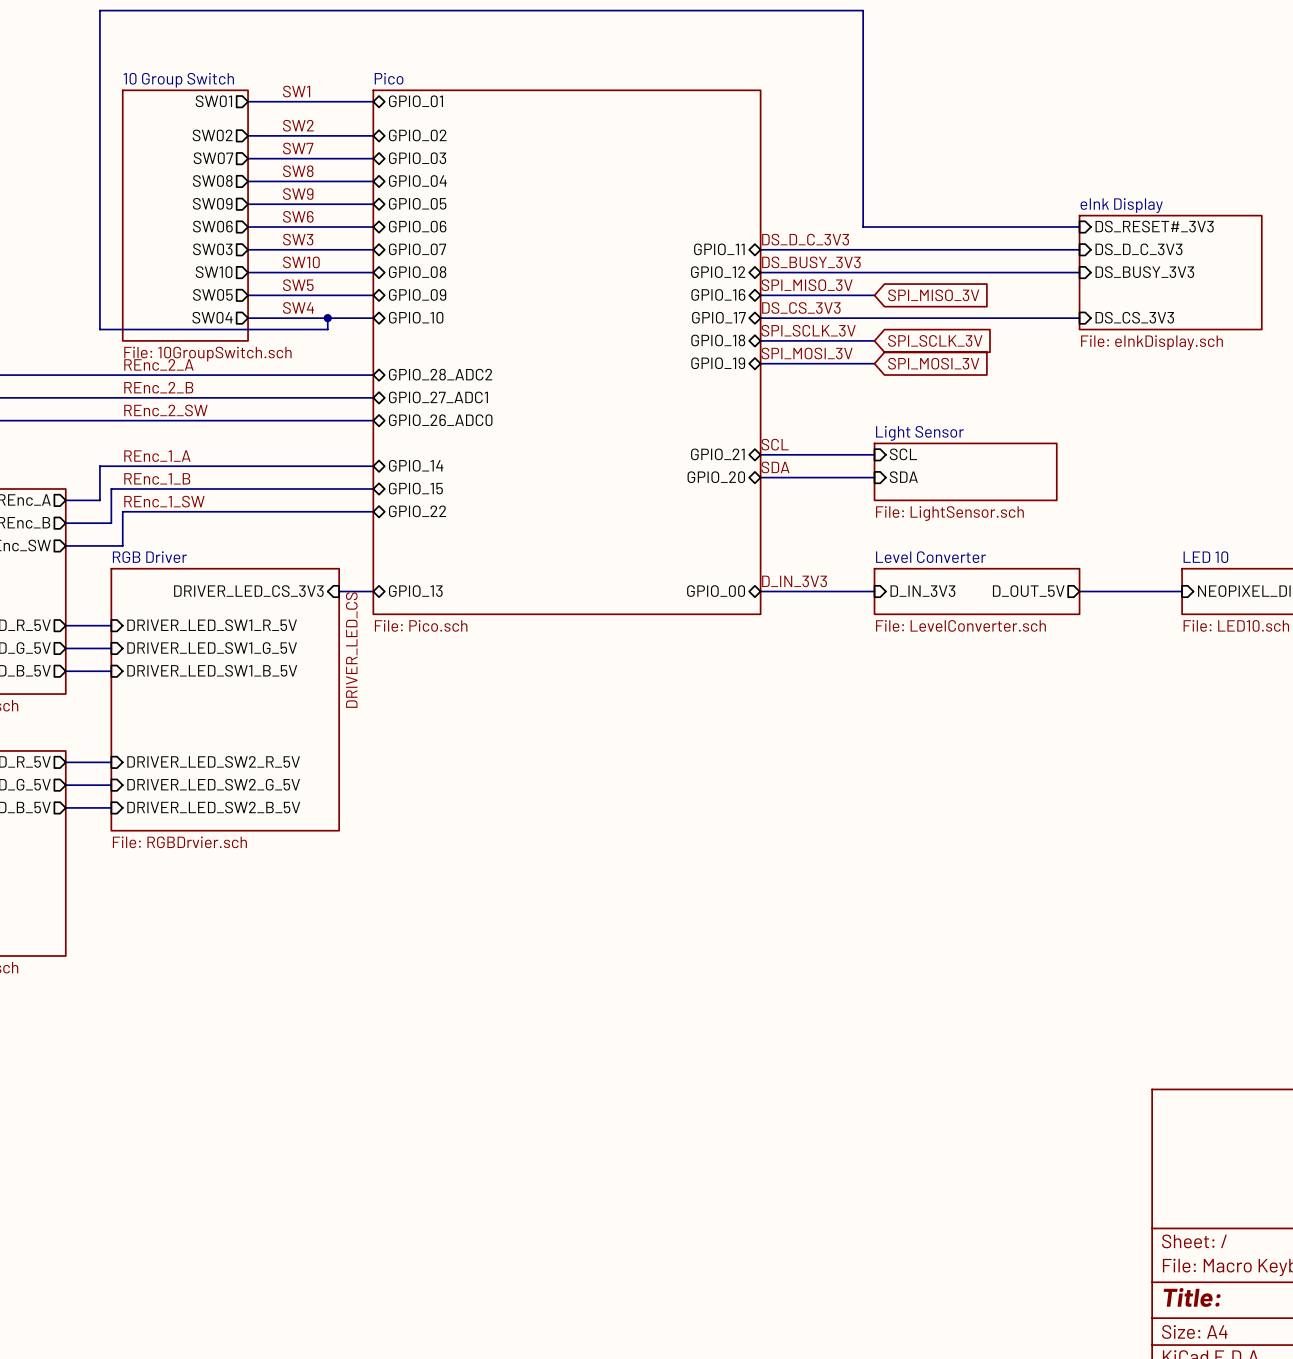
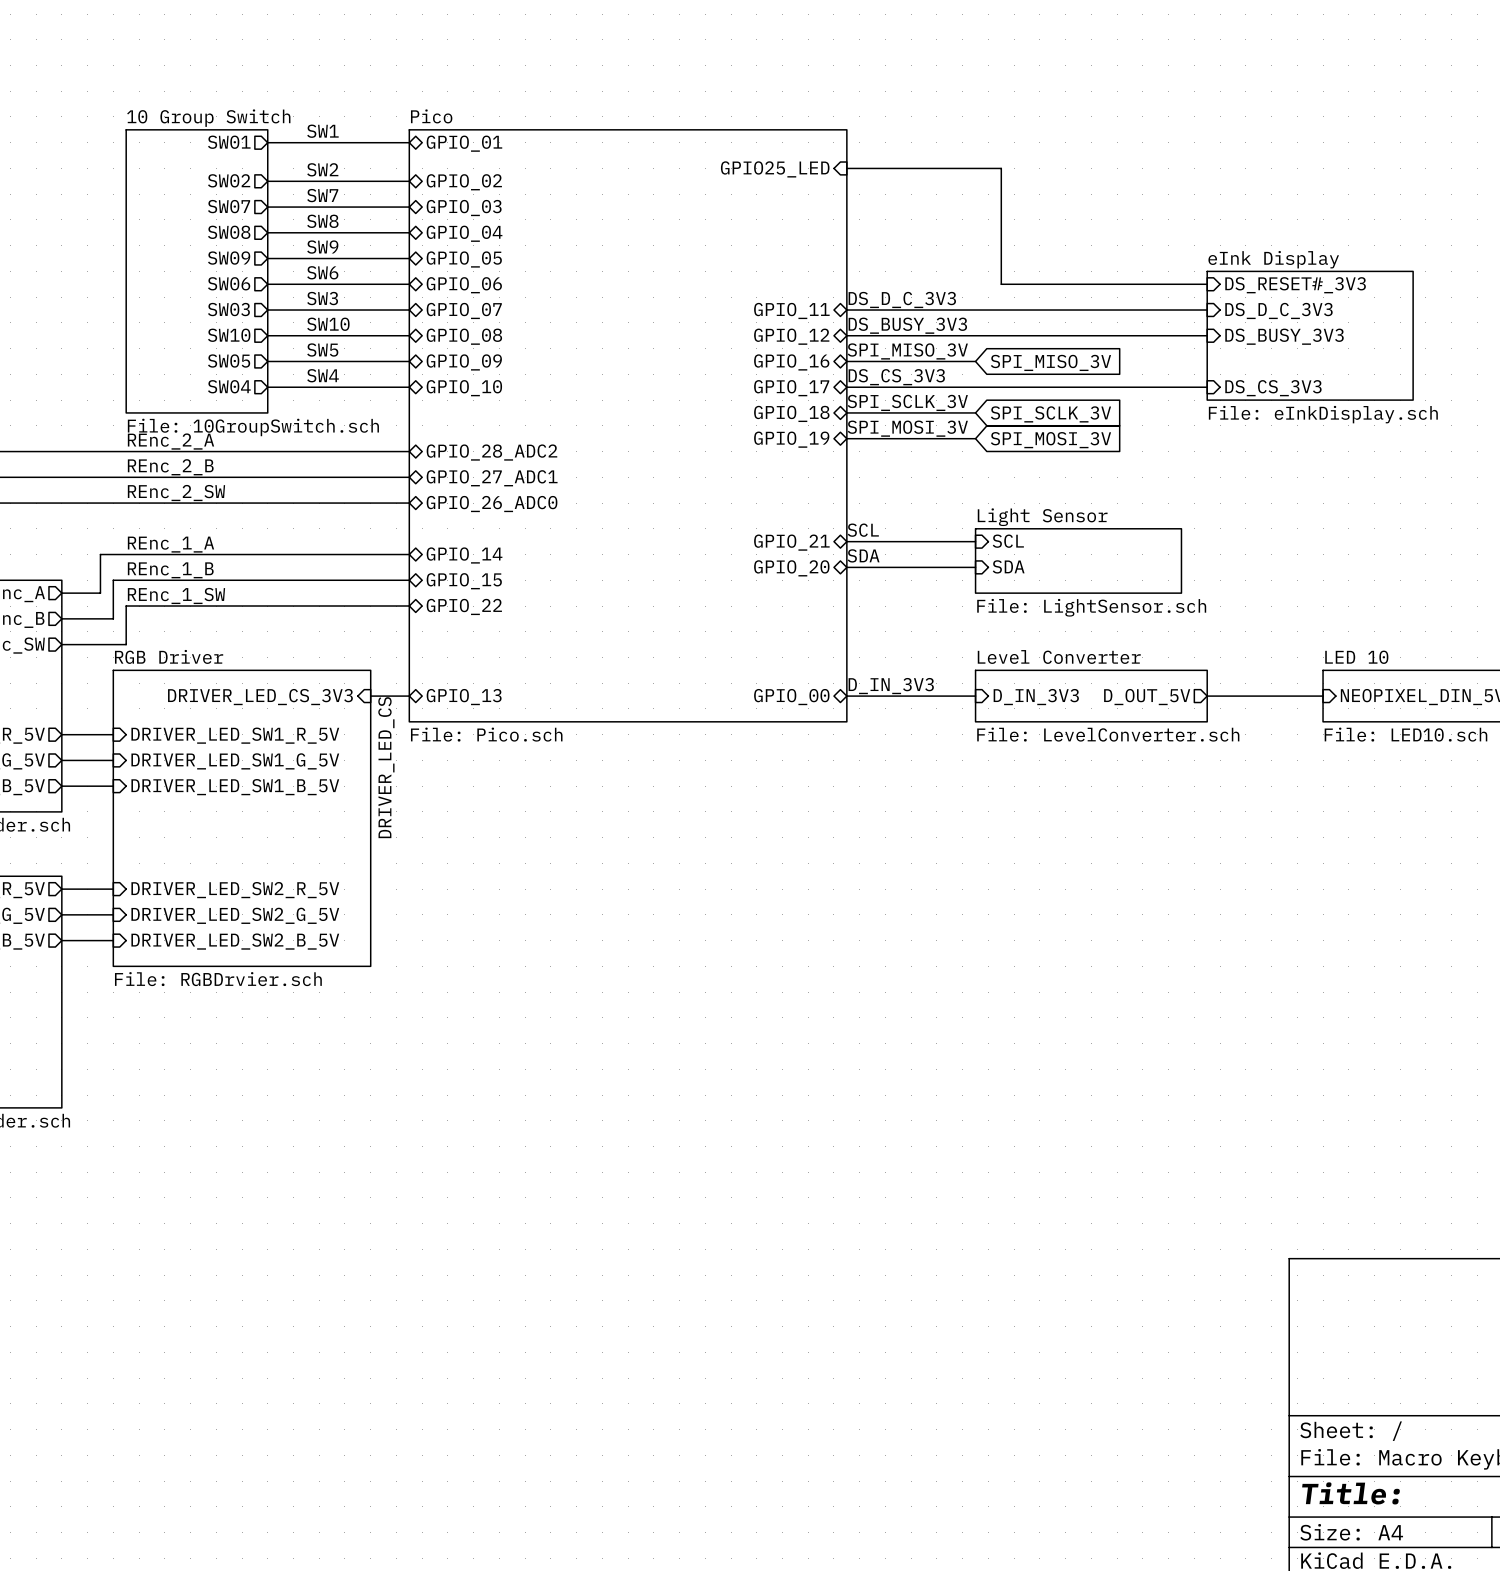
sheet pin: none -> GPIO25_LED (775, 169)
wire: (897, 227) (863, 227) (863, 10) (99, 10) (99, 329) (327, 329) (327, 318) -> (1001, 284) (1001, 168) (846, 168)
junction: (327, 318) -> none

